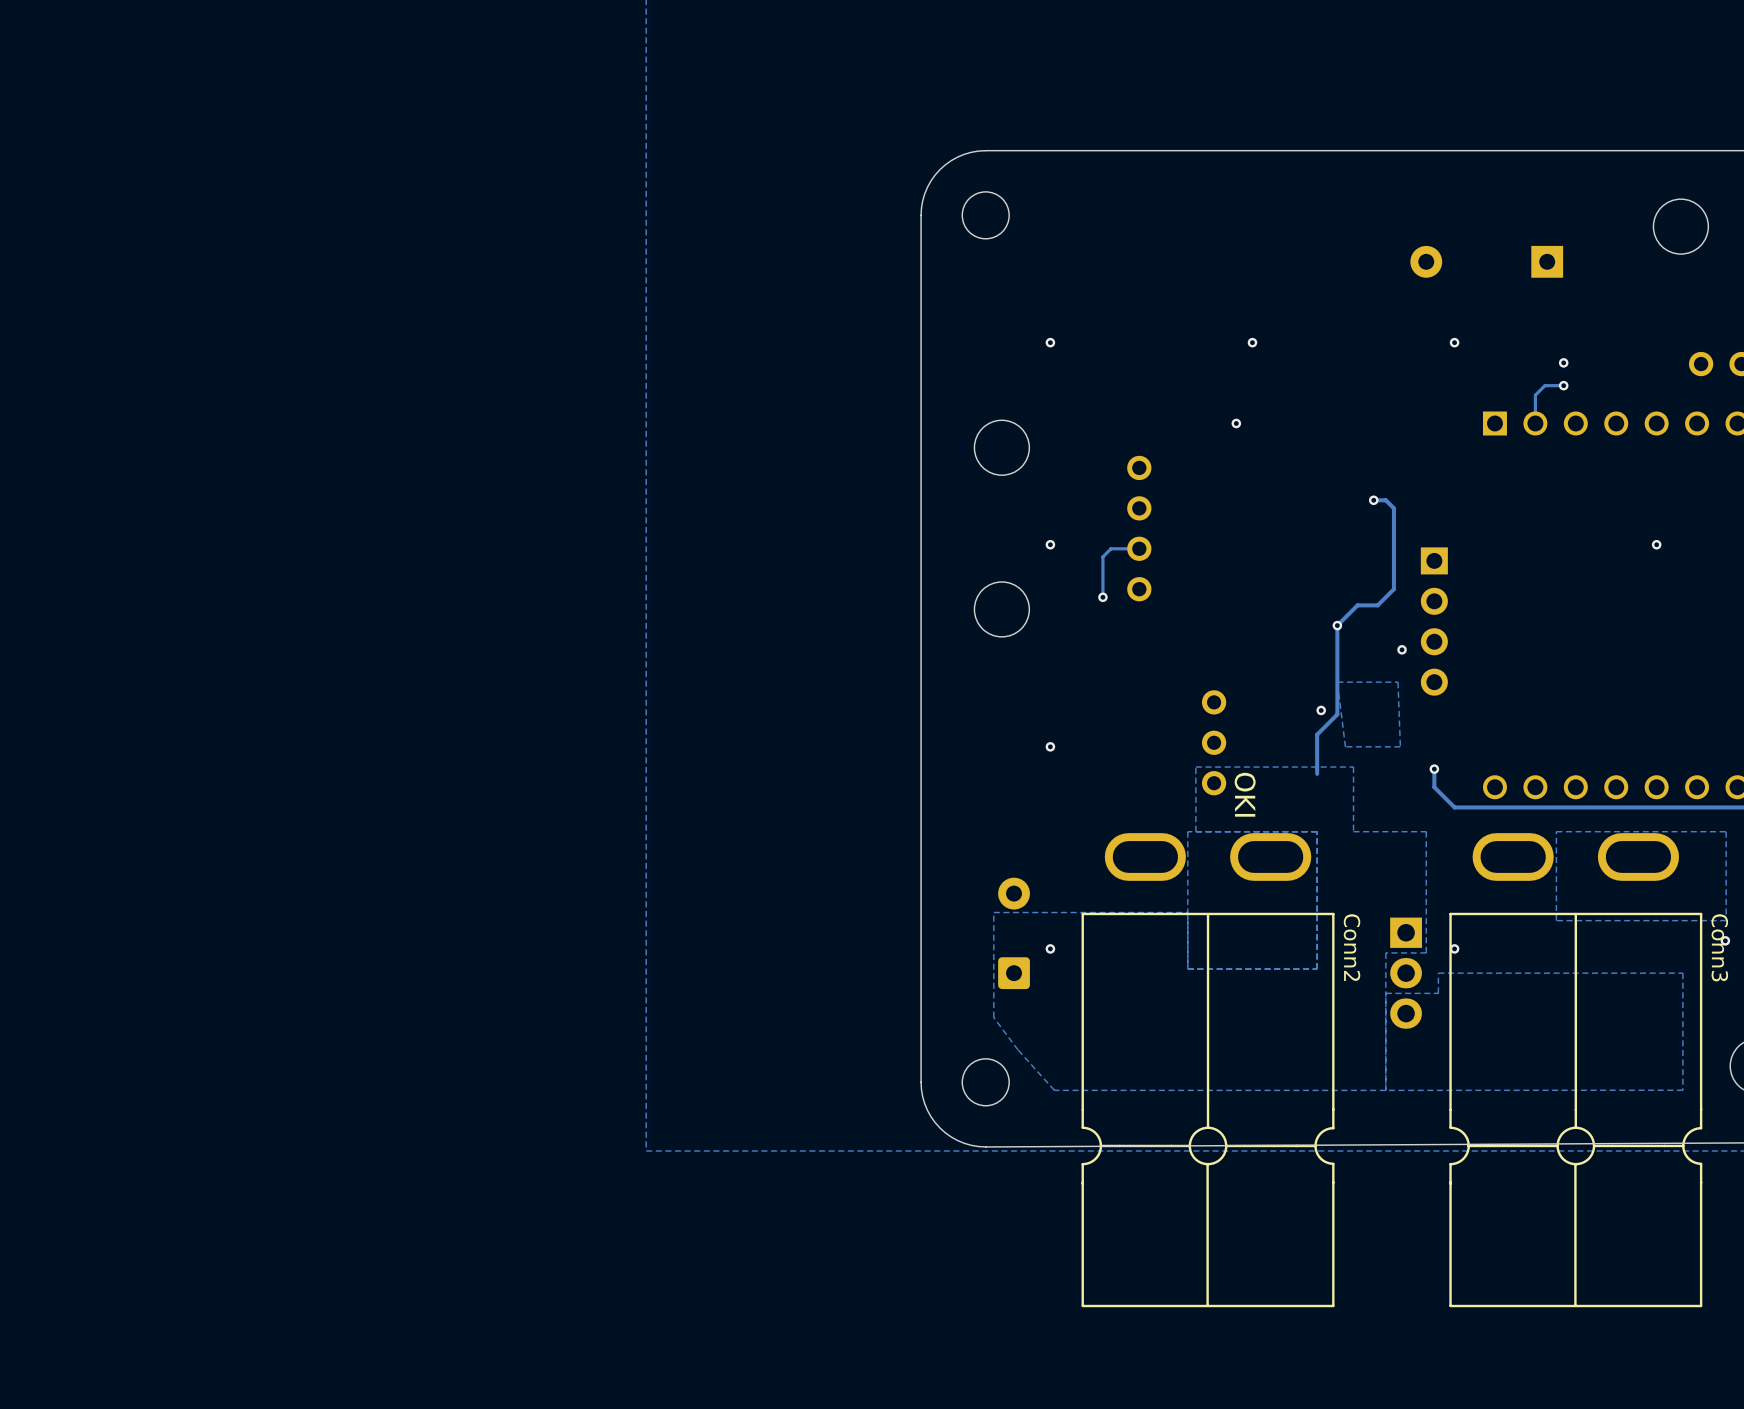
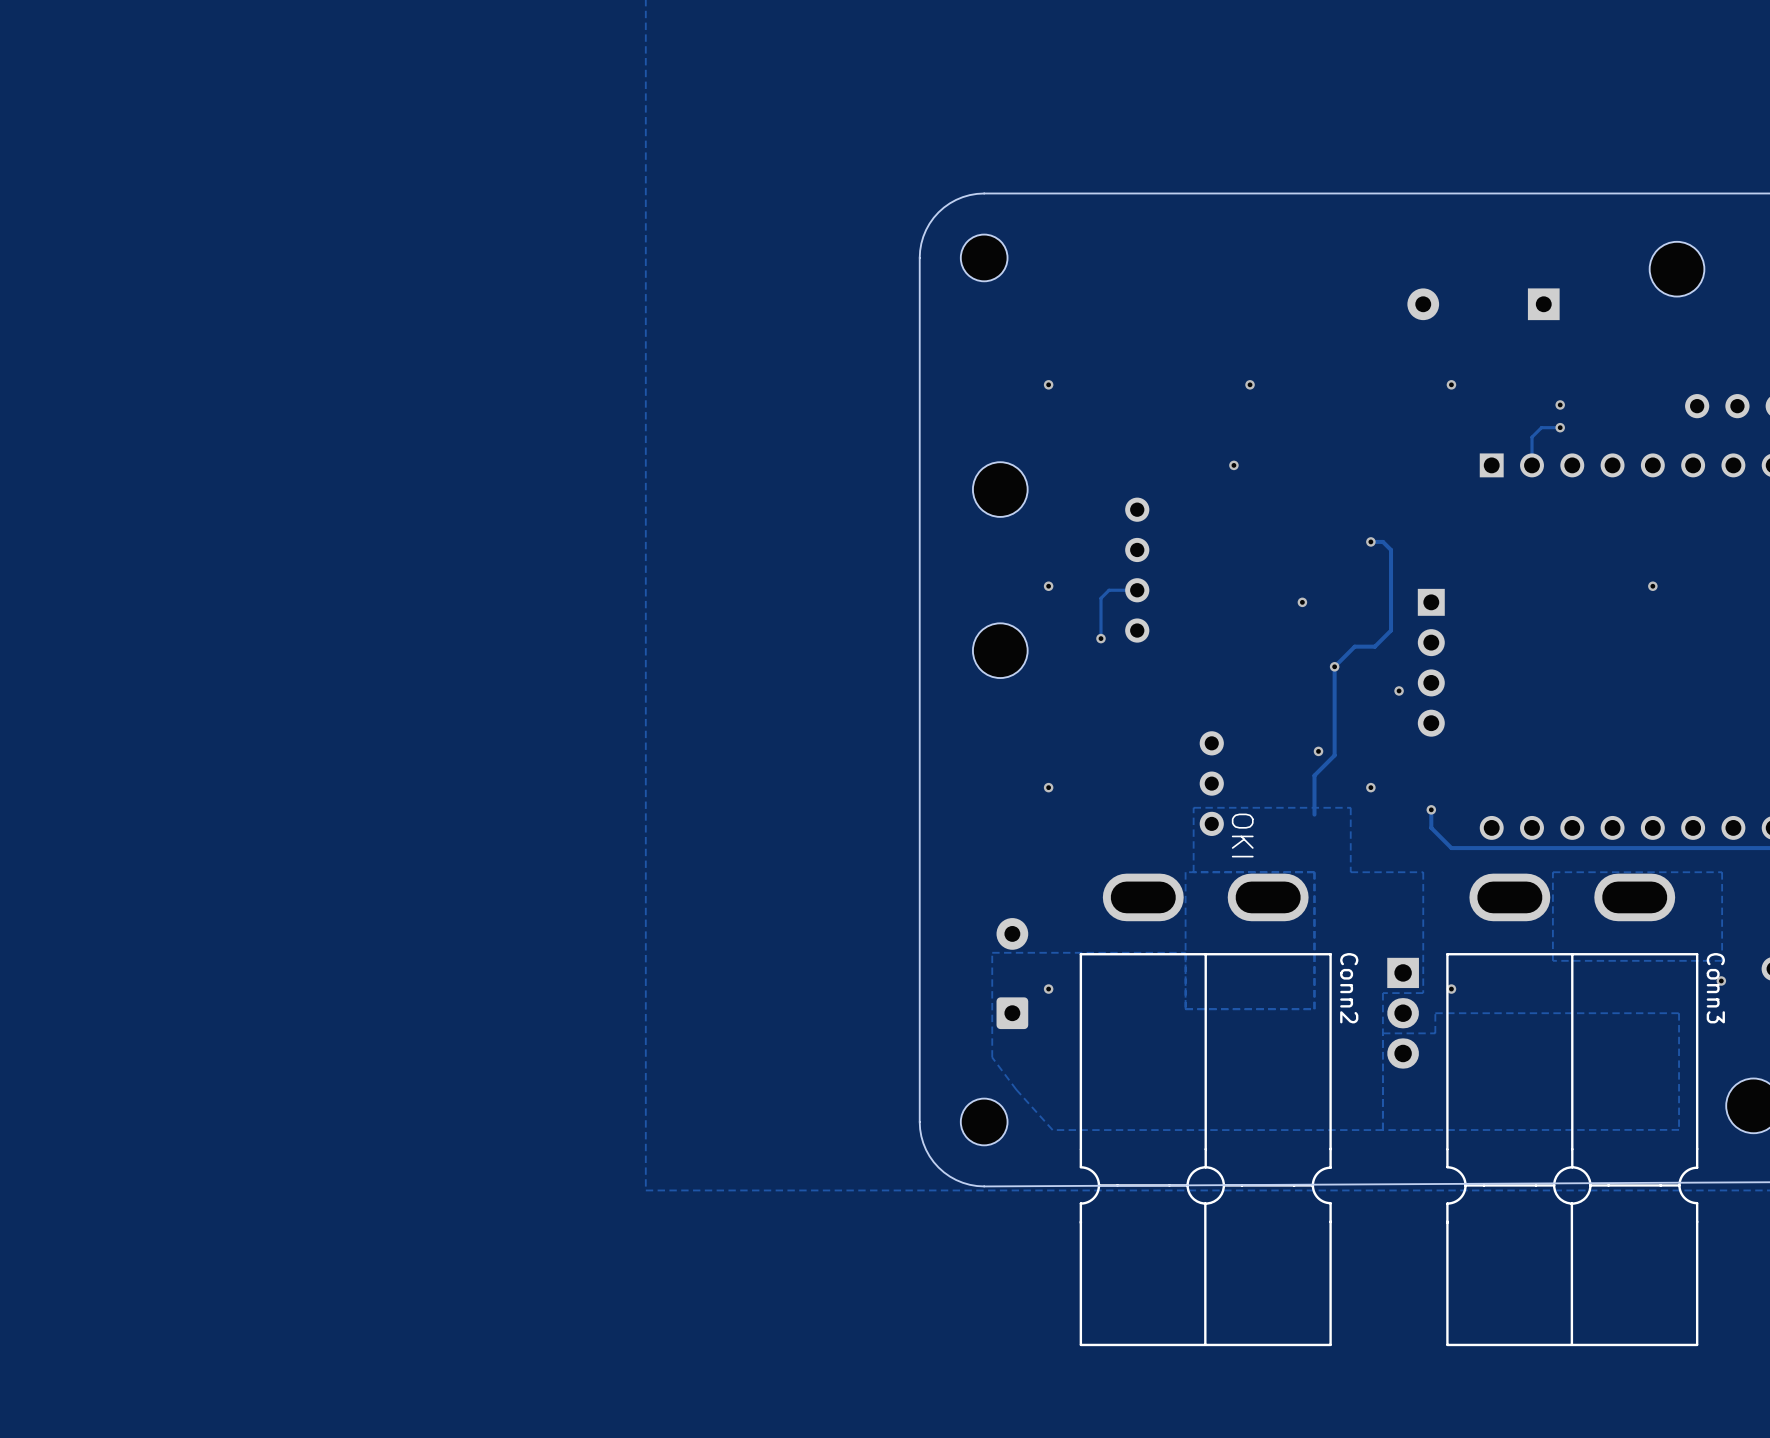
via: none -> (1302, 602)
zone outline: (1397, 682) (1400, 746) (1345, 746) (1337, 682) (1397, 682) -> none
via: none -> (1370, 787)

